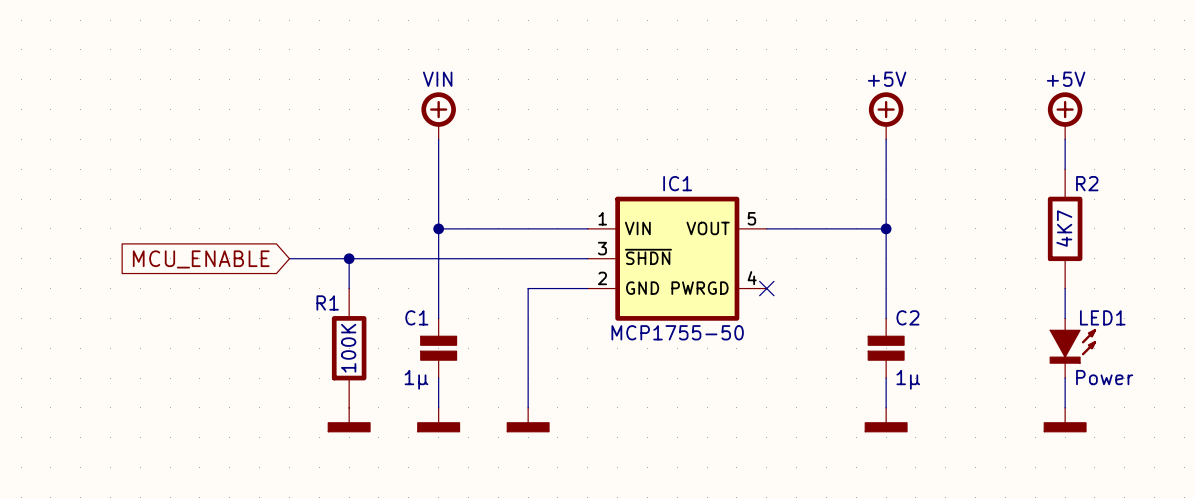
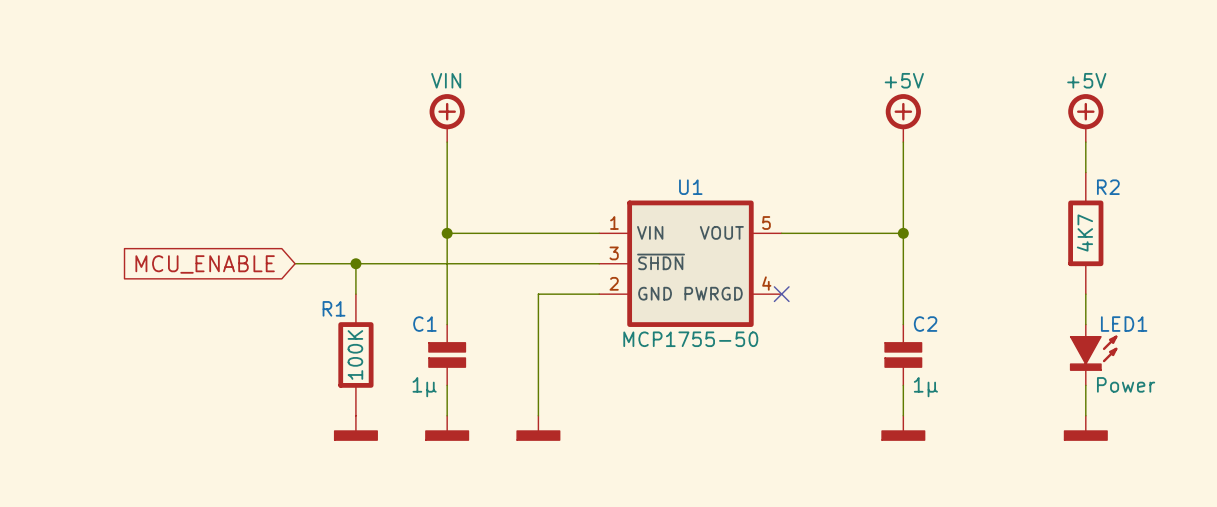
IC1 name: IC1 (677, 183) -> U1 (690, 187)

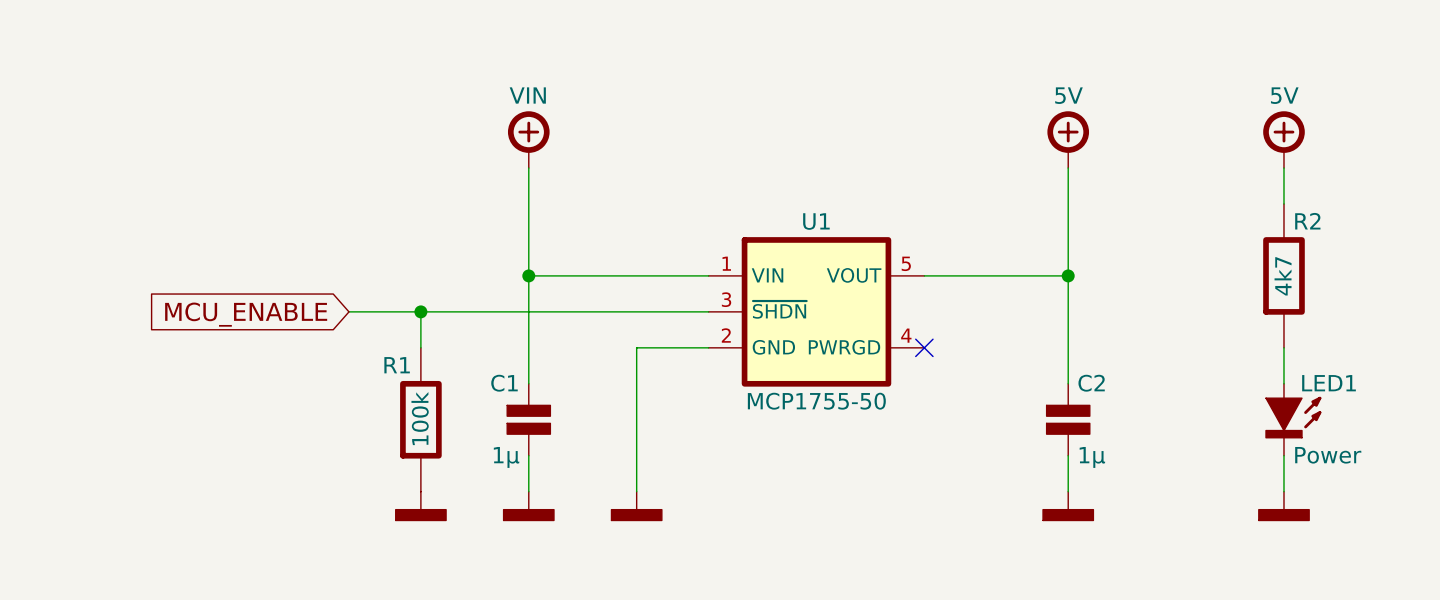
power symbol text: +5V (904, 80) -> 5V (1068, 95)
power symbol text: +5V (1086, 80) -> 5V (1284, 95)
R2 value: 4K7 (1084, 233) -> 4k7 (1283, 276)
R1 value: 100K (355, 354) -> 100k (420, 418)

